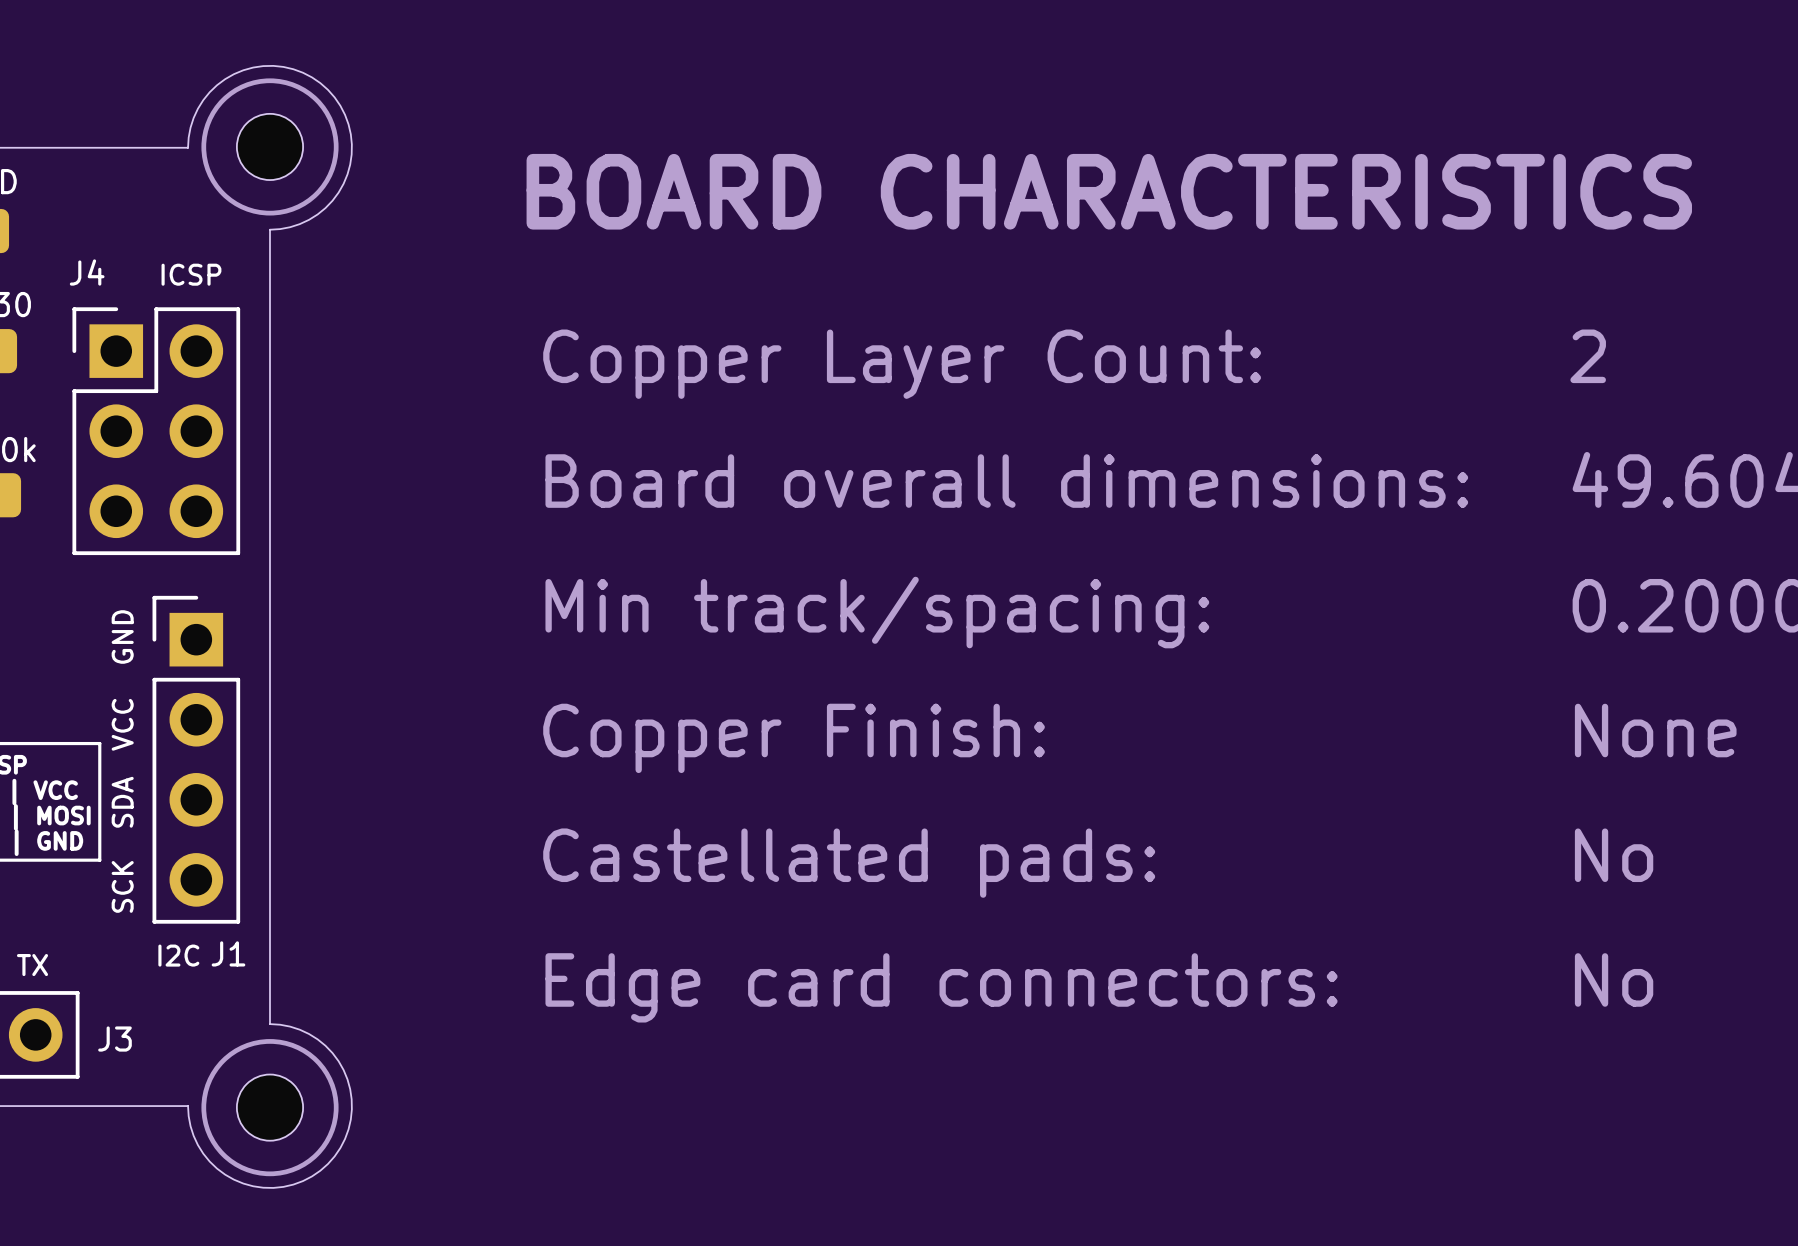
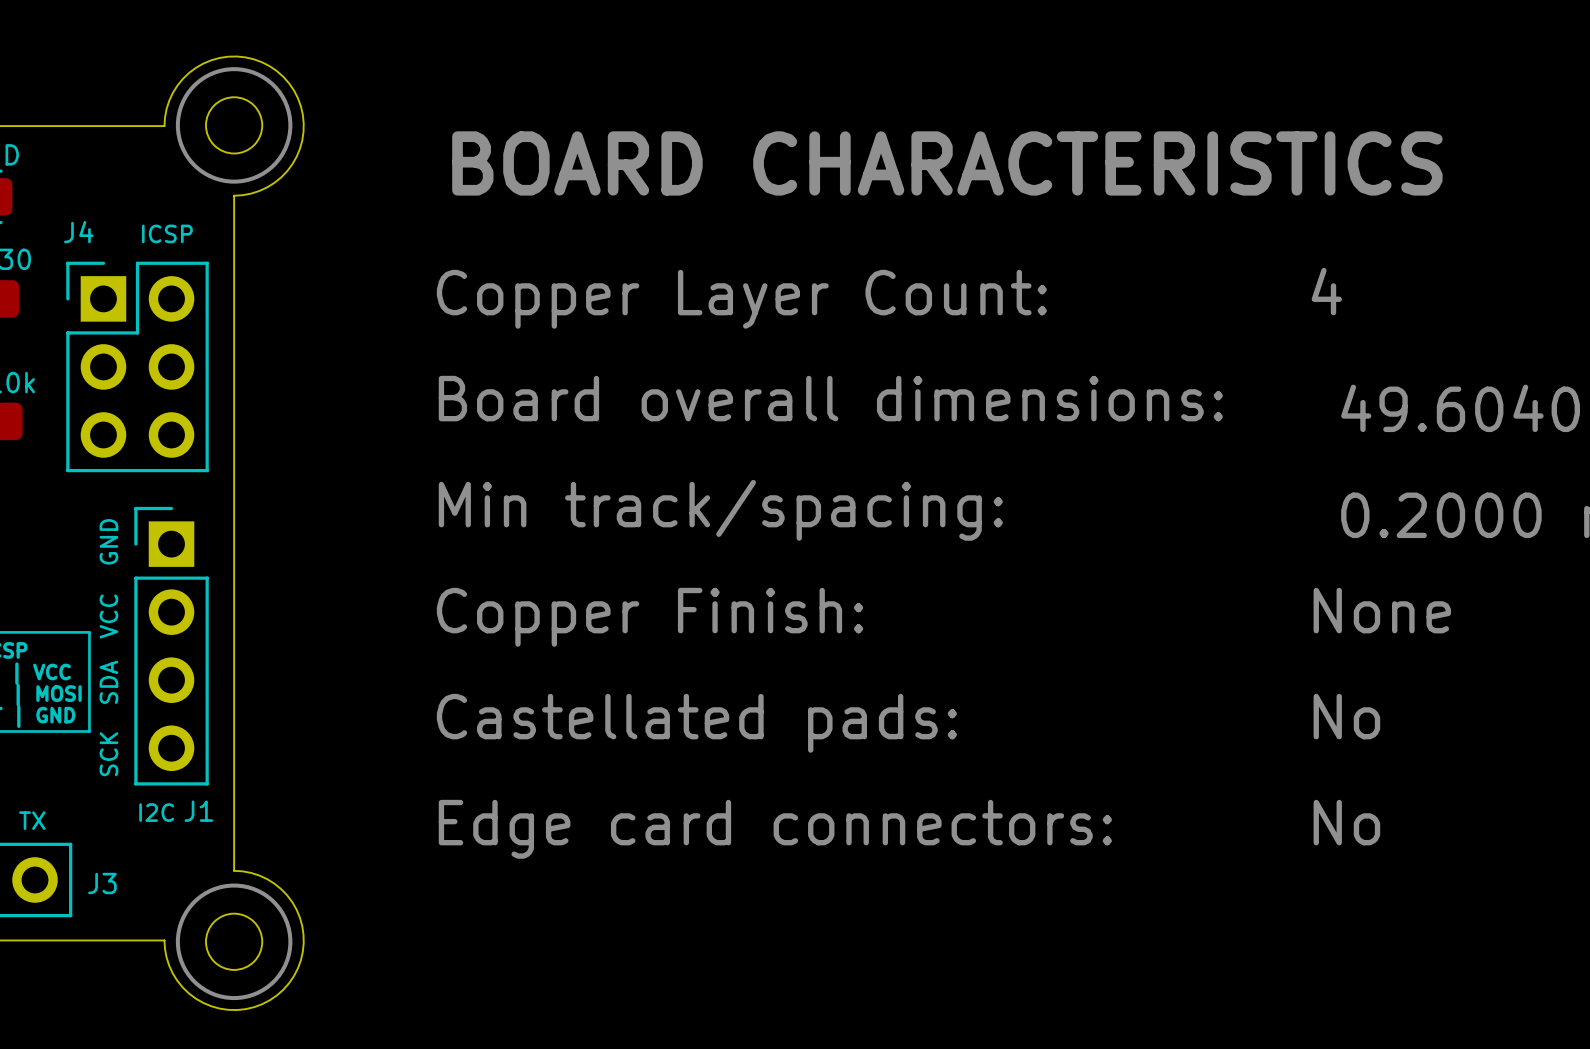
text: none -> 4 (1326, 291)
text: 2 (1588, 356) -> none
text position: Copper Layer Count: (902, 364) -> Copper Layer Count: (741, 299)
text position: Board overall dimensions: (1006, 481) -> Board overall dimensions: (830, 398)
text position: Min track/spacing: (877, 612) -> Min track/spacing: (720, 510)
text position: None (1655, 730) -> None (1382, 610)
text position: Copper Finish: (794, 738) -> Copper Finish: (650, 617)
text position: No (1614, 855) -> No (1346, 716)
text position: Castellated pads: (849, 863) -> Castellated pads: (696, 723)
text position: No (1614, 979) -> No (1346, 822)
text position: Edge card connectors: (941, 987) -> Edge card connectors: (775, 829)

